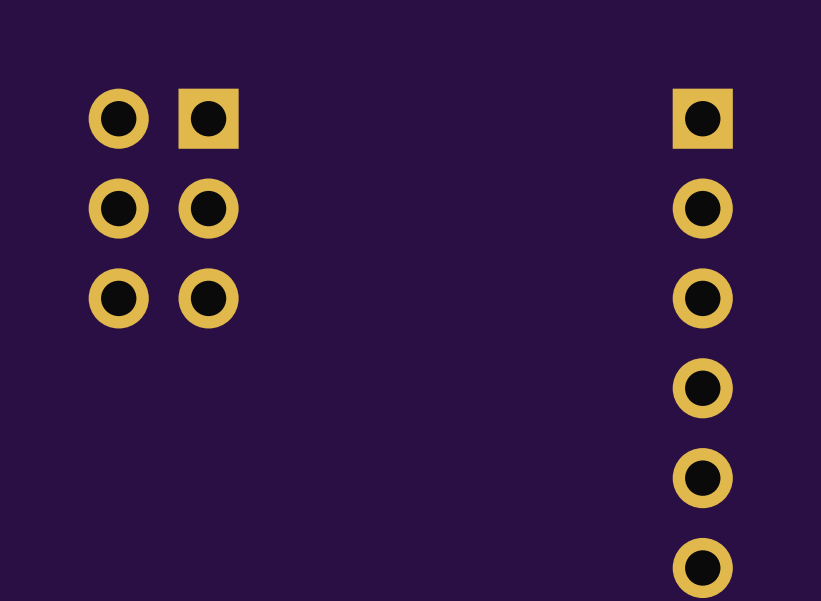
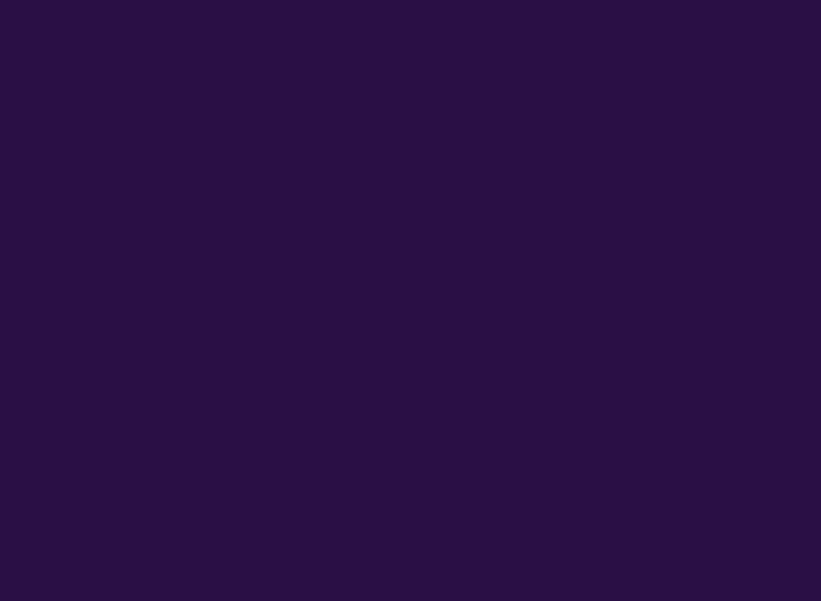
part: (163, 208) -> none
part: (702, 343) -> none

